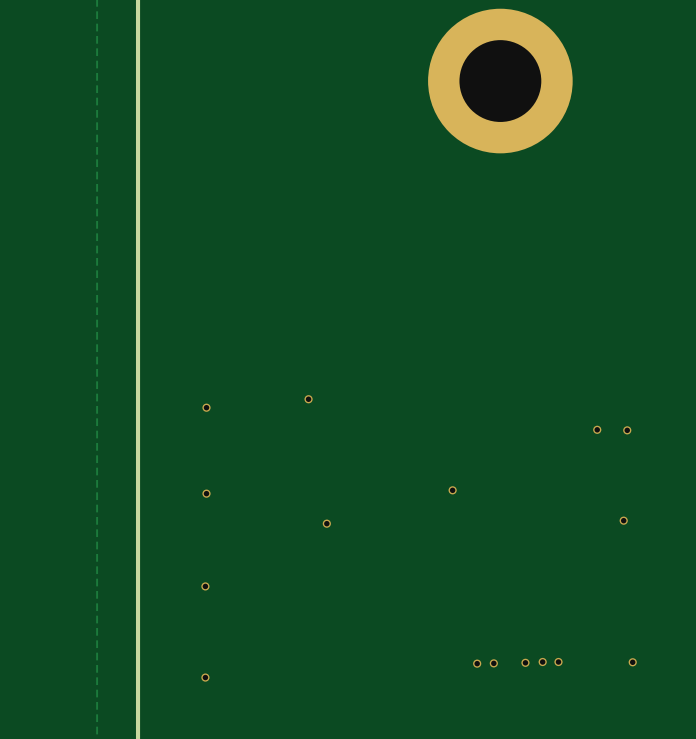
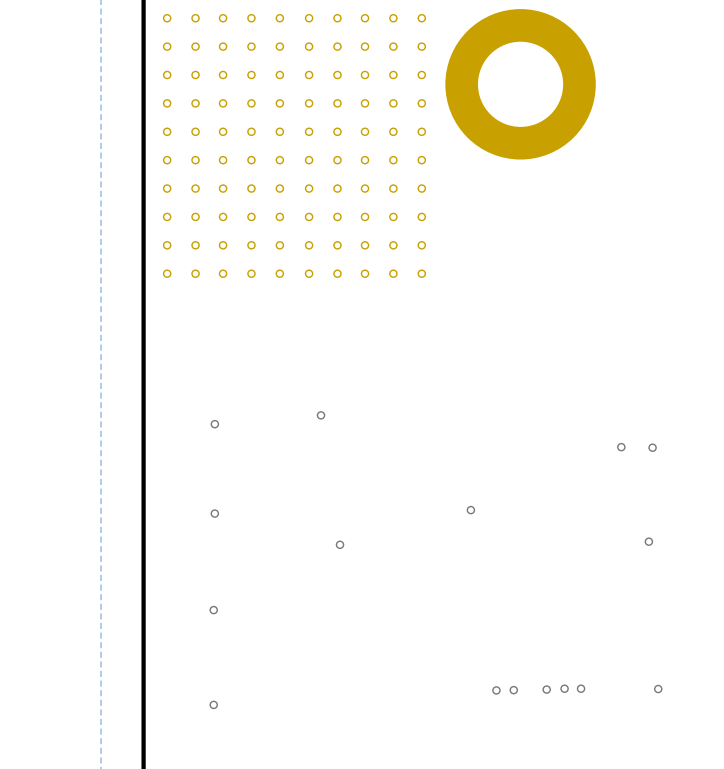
part: none -> (167, 18)
part: none -> (195, 18)
part: none -> (223, 18)
part: none -> (251, 18)
part: none -> (279, 18)
part: none -> (309, 18)
part: none -> (337, 18)
part: none -> (365, 18)
part: none -> (393, 18)
part: none -> (421, 18)
part: none -> (167, 46)
part: none -> (195, 46)
part: none -> (223, 46)
part: none -> (251, 46)
part: none -> (279, 46)
part: none -> (309, 46)
part: none -> (337, 46)
part: none -> (365, 46)
part: none -> (393, 46)
part: none -> (421, 46)
part: none -> (167, 75)
part: none -> (195, 75)
part: none -> (223, 75)
part: none -> (251, 75)
part: none -> (279, 75)
part: none -> (309, 75)
part: none -> (337, 75)
part: none -> (365, 75)
part: none -> (393, 75)
part: none -> (421, 75)
part: none -> (167, 103)
part: none -> (195, 103)
part: none -> (223, 103)
part: none -> (251, 103)
part: none -> (279, 103)
part: none -> (309, 103)
part: none -> (337, 103)
part: none -> (365, 103)
part: none -> (393, 103)
part: none -> (421, 103)
part: none -> (167, 131)
part: none -> (195, 131)
part: none -> (223, 131)
part: none -> (251, 131)
part: none -> (279, 131)
part: none -> (309, 131)
part: none -> (337, 131)
part: none -> (365, 131)
part: none -> (393, 131)
part: none -> (421, 131)
part: none -> (167, 160)
part: none -> (195, 160)
part: none -> (223, 160)
part: none -> (251, 160)
part: none -> (279, 160)
part: none -> (309, 160)
part: none -> (337, 160)
part: none -> (365, 160)
part: none -> (393, 160)
part: none -> (421, 160)
part: none -> (167, 188)
part: none -> (195, 188)
part: none -> (223, 188)
part: none -> (251, 188)
part: none -> (279, 188)
part: none -> (309, 188)
part: none -> (337, 188)
part: none -> (365, 188)
part: none -> (393, 188)
part: none -> (421, 188)
part: none -> (167, 216)
part: none -> (195, 216)
part: none -> (223, 216)
part: none -> (251, 216)
part: none -> (279, 216)
part: none -> (309, 216)
part: none -> (337, 216)
part: none -> (365, 216)
part: none -> (393, 216)
part: none -> (421, 216)
part: none -> (167, 245)
part: none -> (195, 245)
part: none -> (223, 245)
part: none -> (251, 245)
part: none -> (279, 245)
part: none -> (309, 245)
part: none -> (337, 245)
part: none -> (365, 245)
part: none -> (393, 245)
part: none -> (421, 245)
part: none -> (167, 273)
part: none -> (195, 273)
part: none -> (223, 273)
part: none -> (251, 273)
part: none -> (279, 273)
part: none -> (309, 273)
part: none -> (337, 273)
part: none -> (365, 273)
part: none -> (393, 273)
part: none -> (421, 273)

